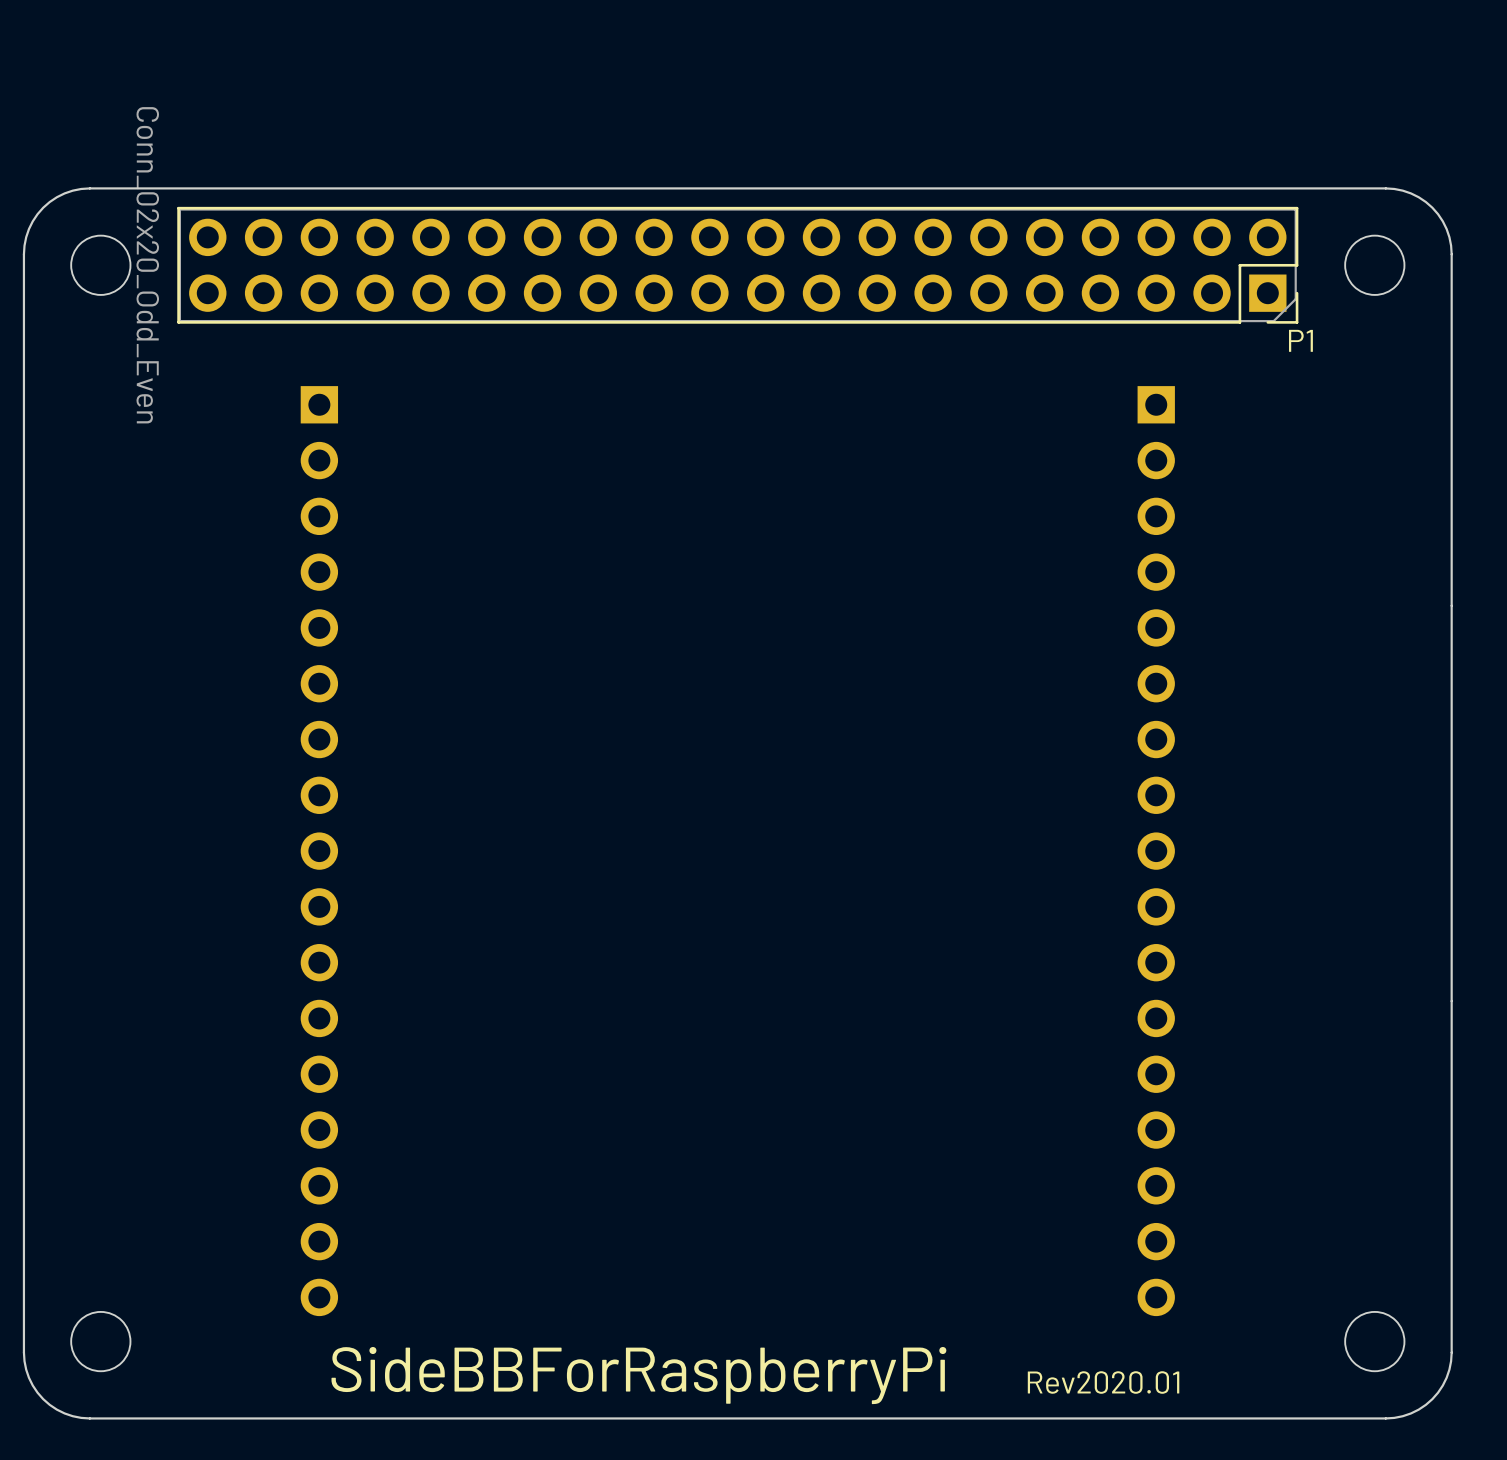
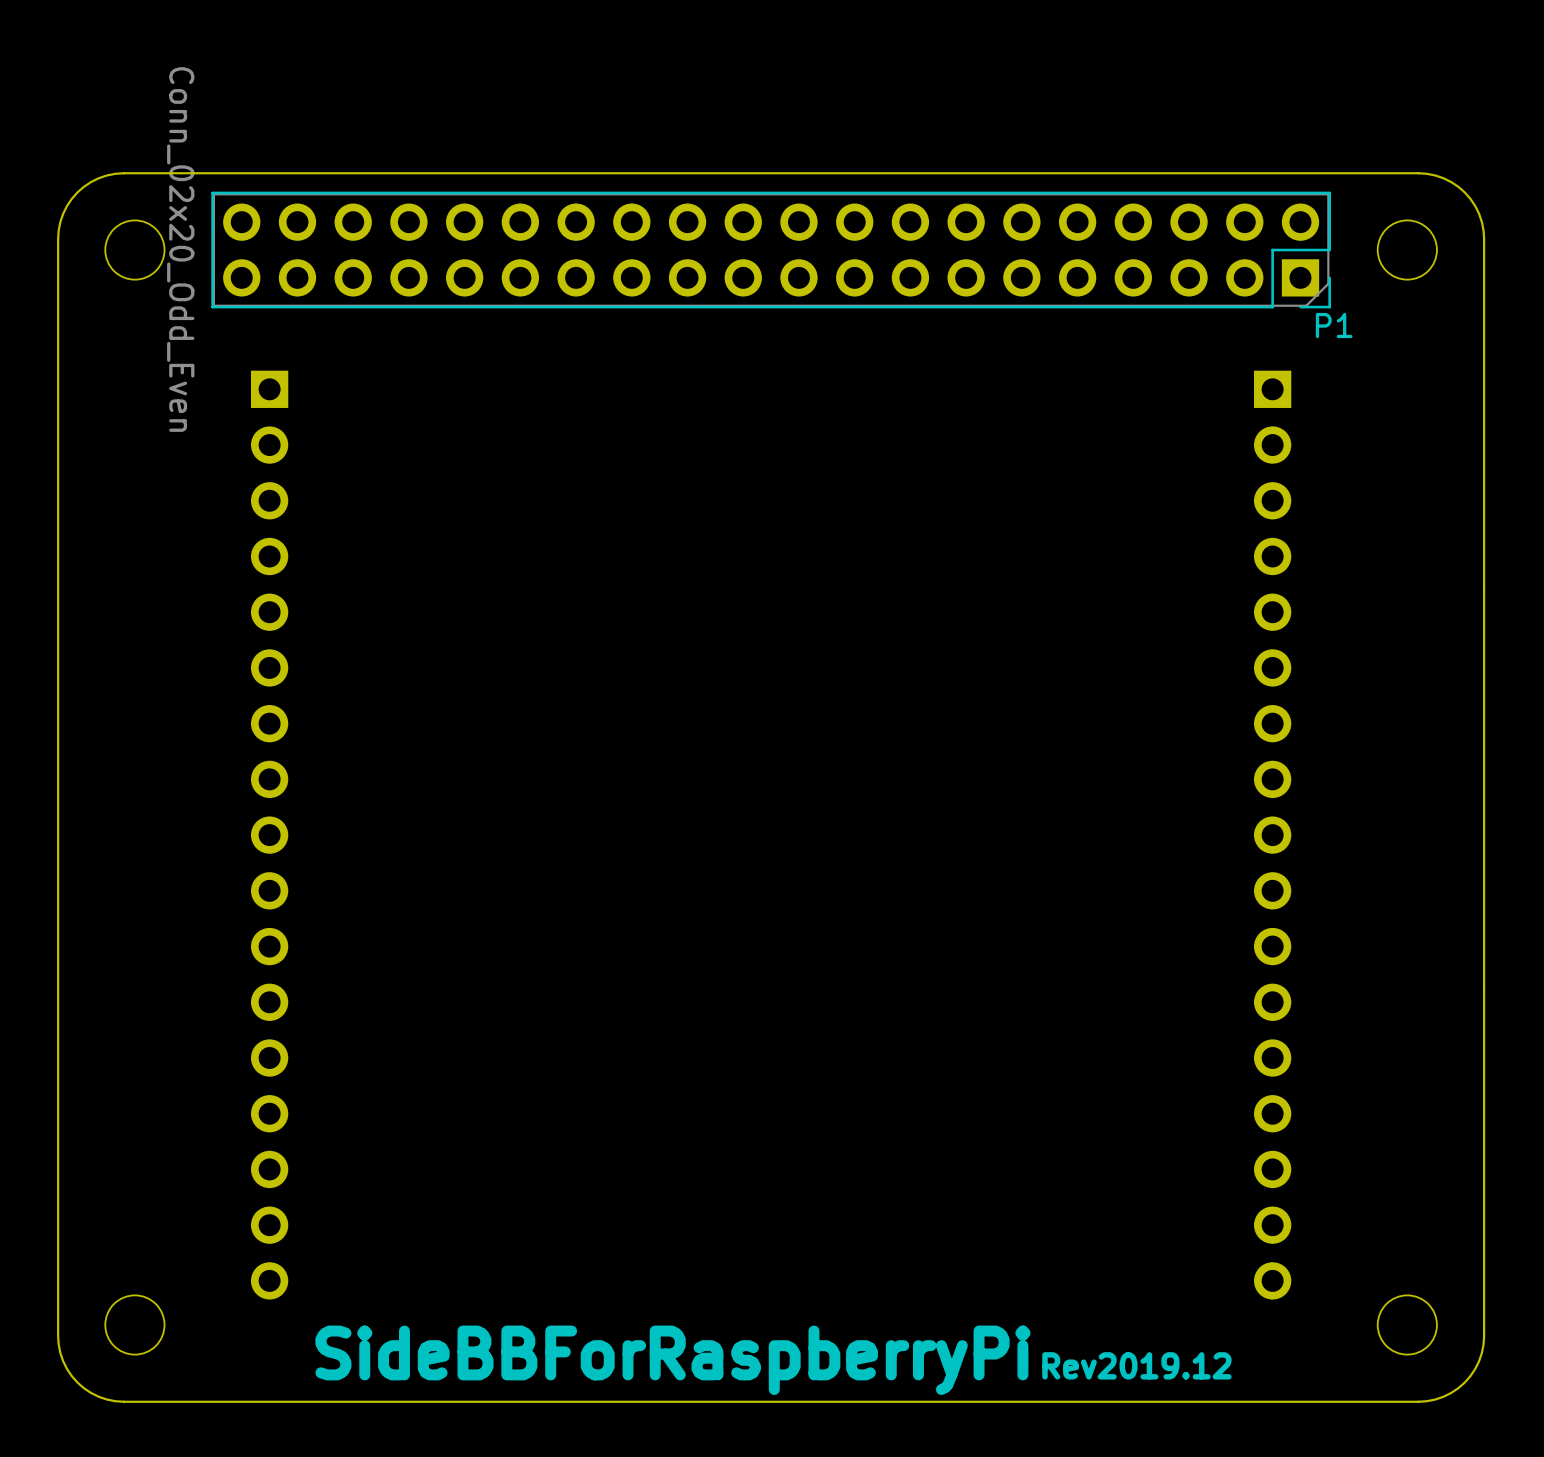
part position: (319, 851) -> (269, 835)
part position: (1156, 851) -> (1272, 835)
text: Rev2020.01 (1103, 1382) -> Rev2019.12 (1136, 1365)

